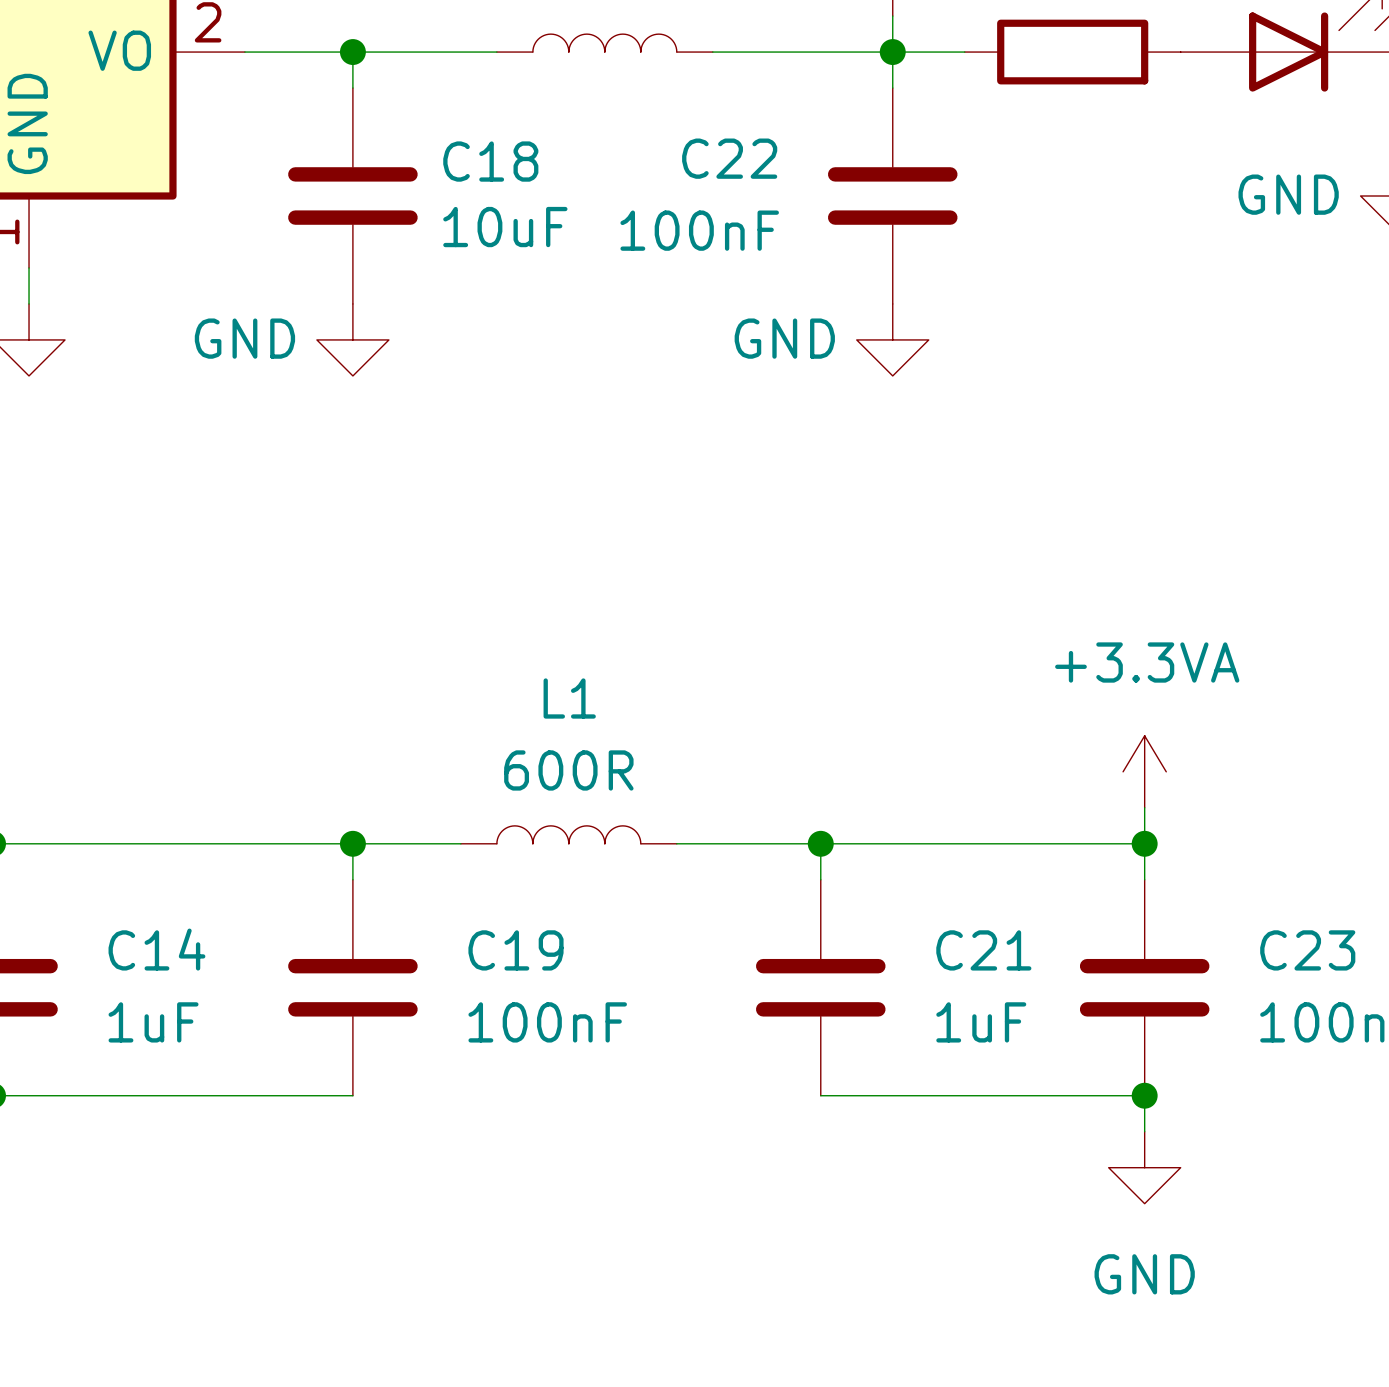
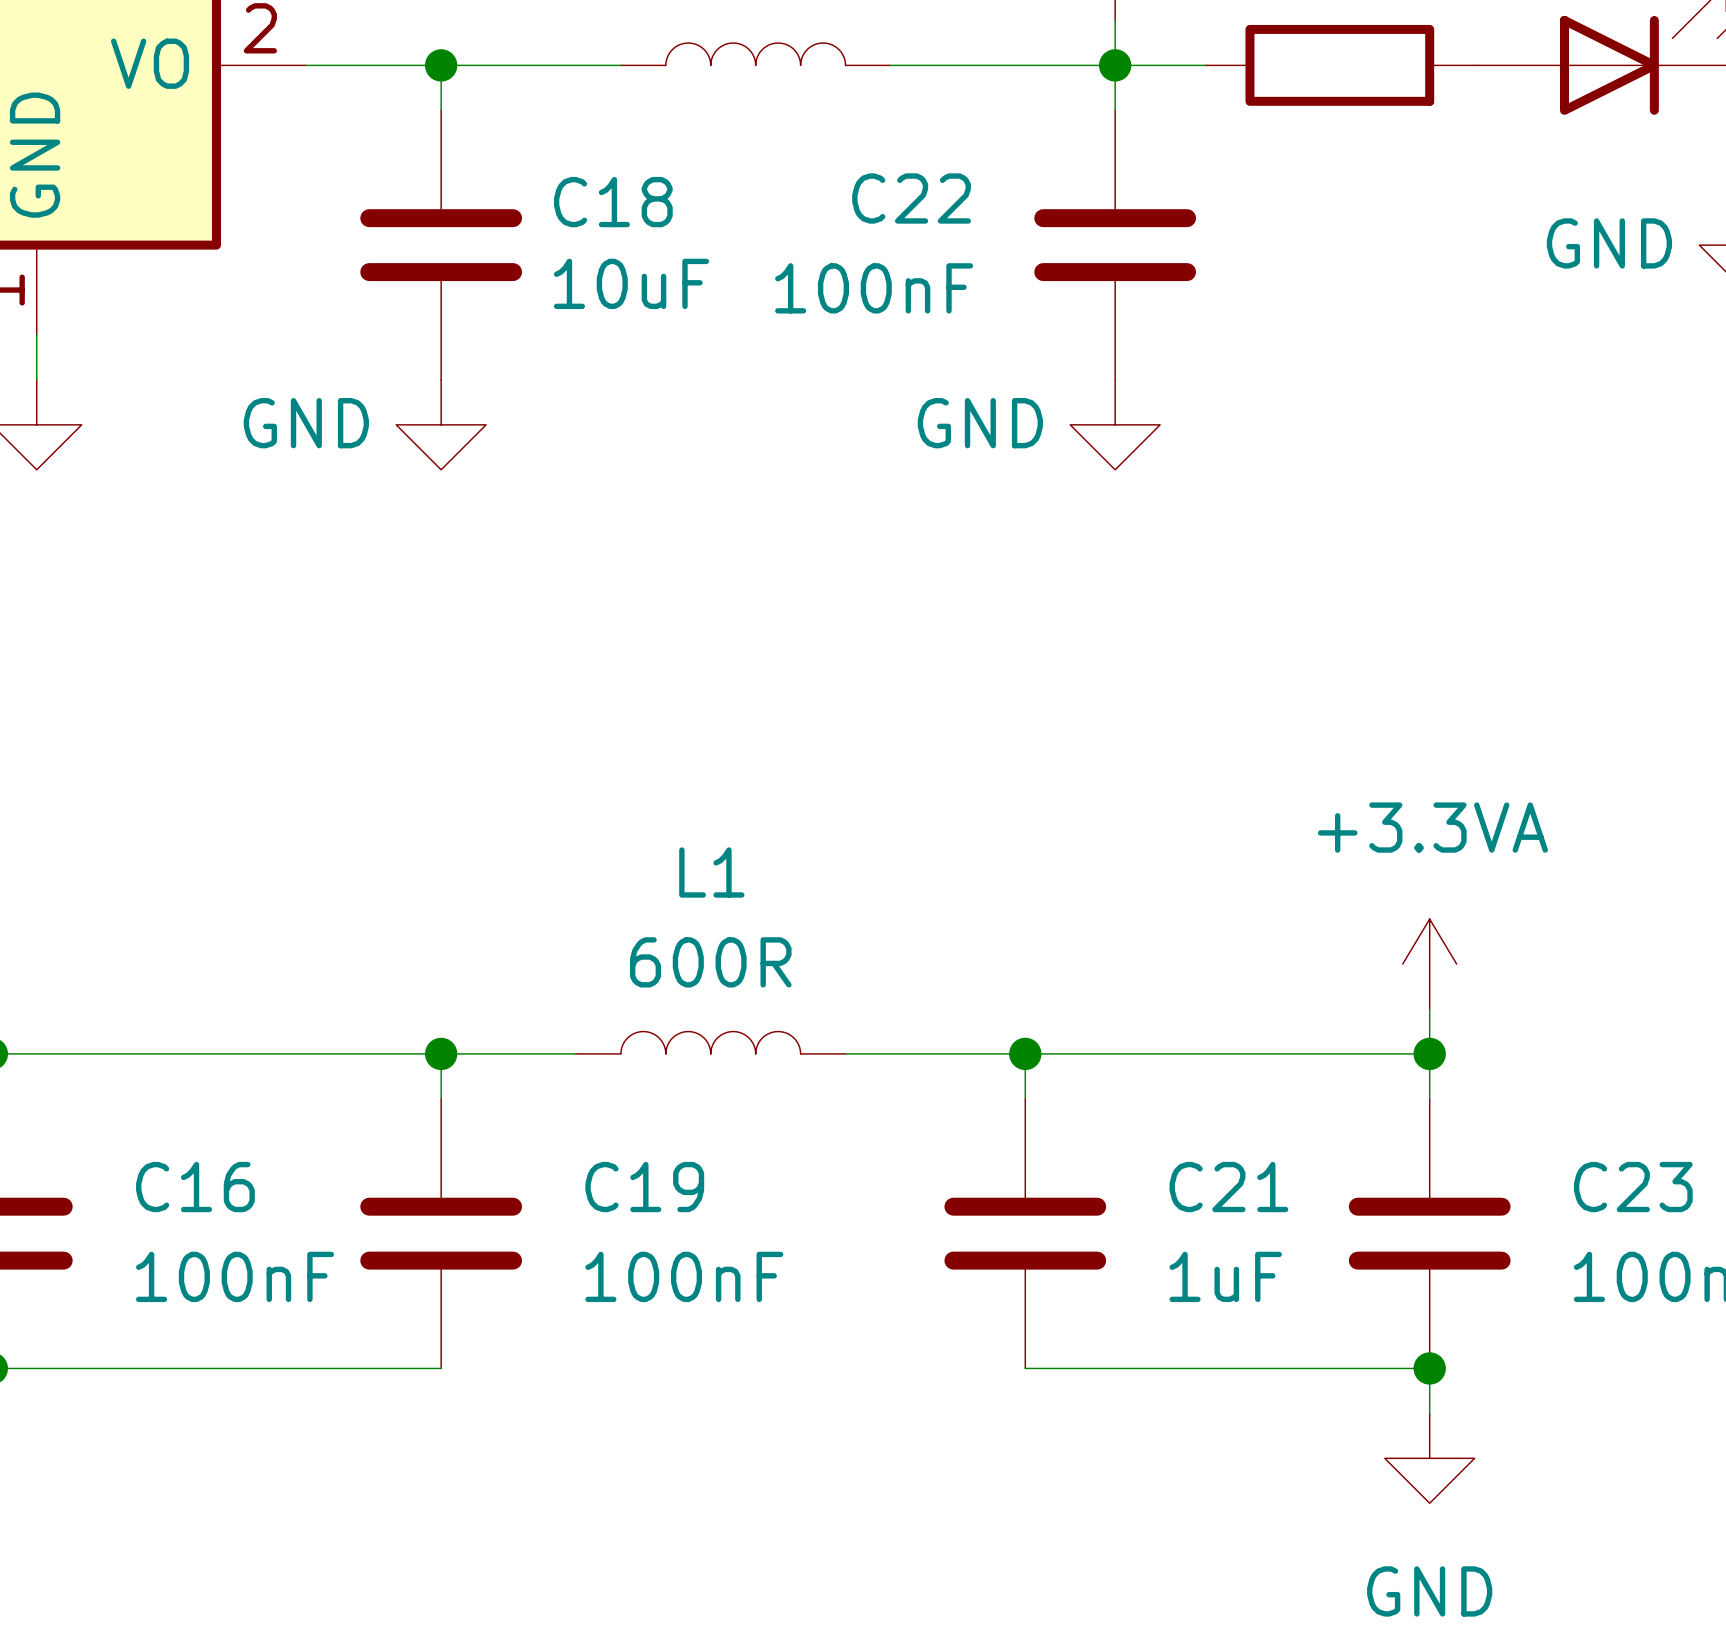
C14 name: C14 (156, 949) -> C16 (195, 1187)
C14 value: 1uF (153, 1022) -> 100nF (235, 1276)

